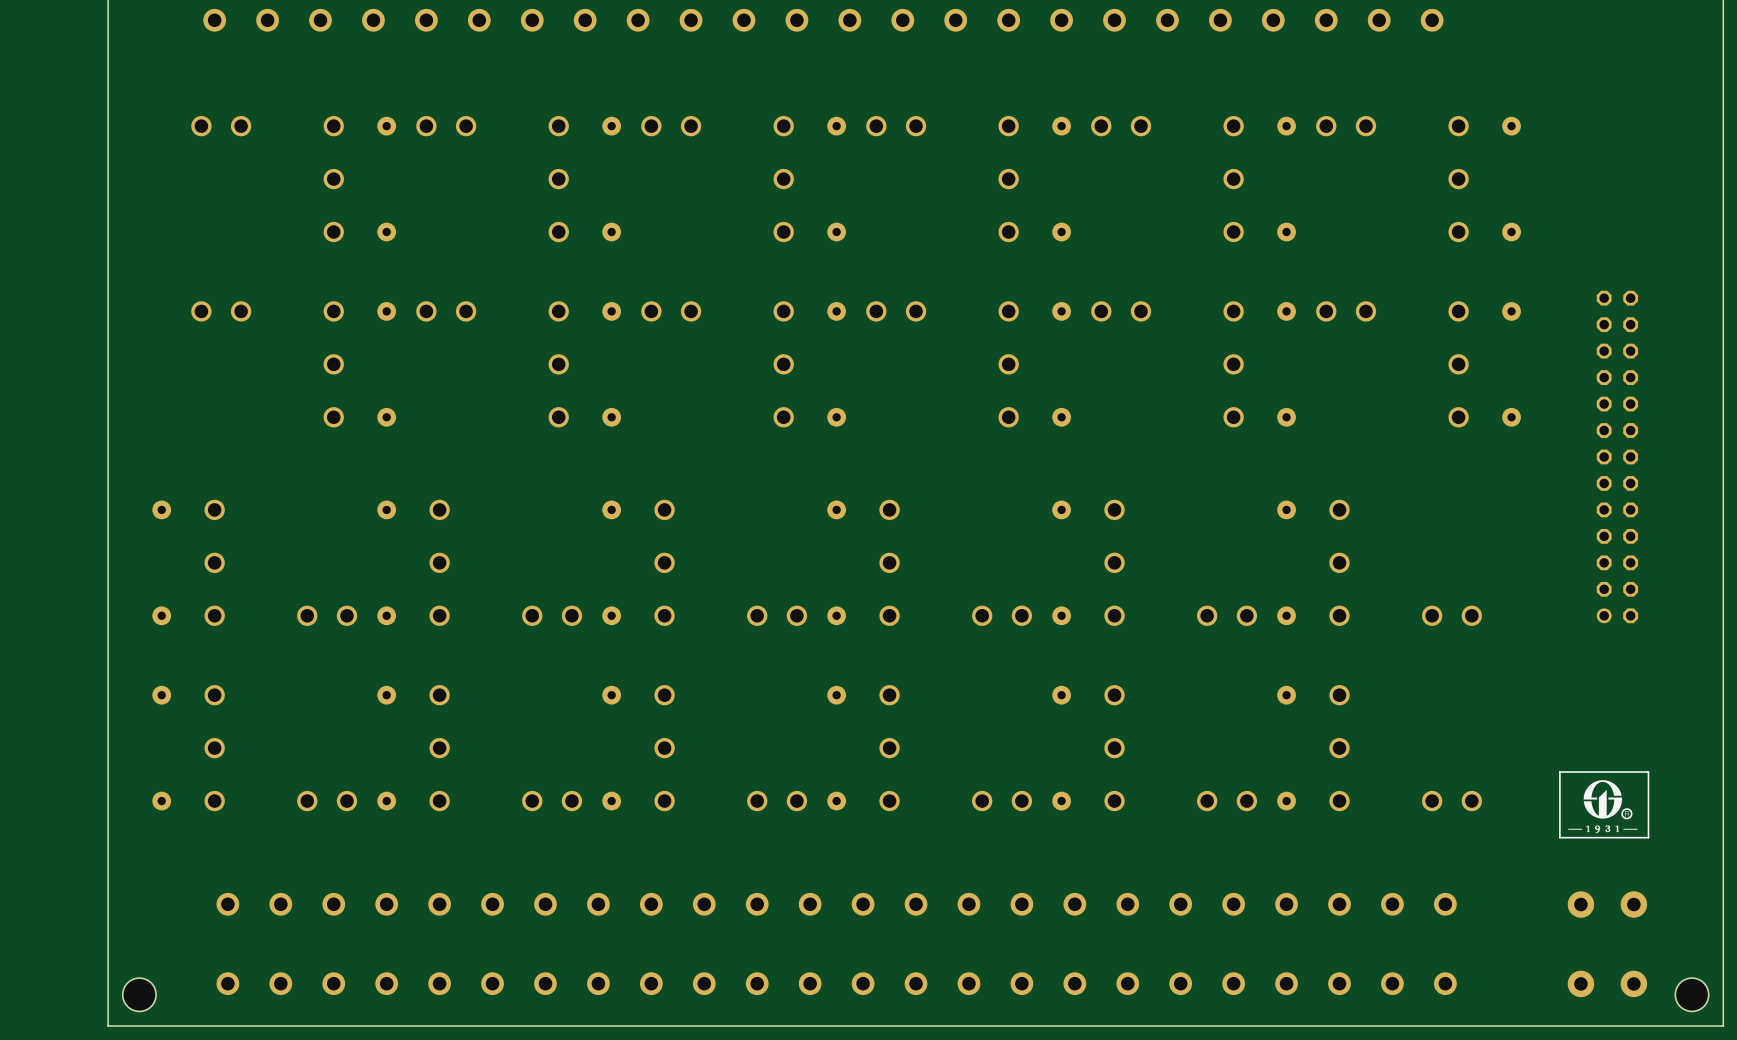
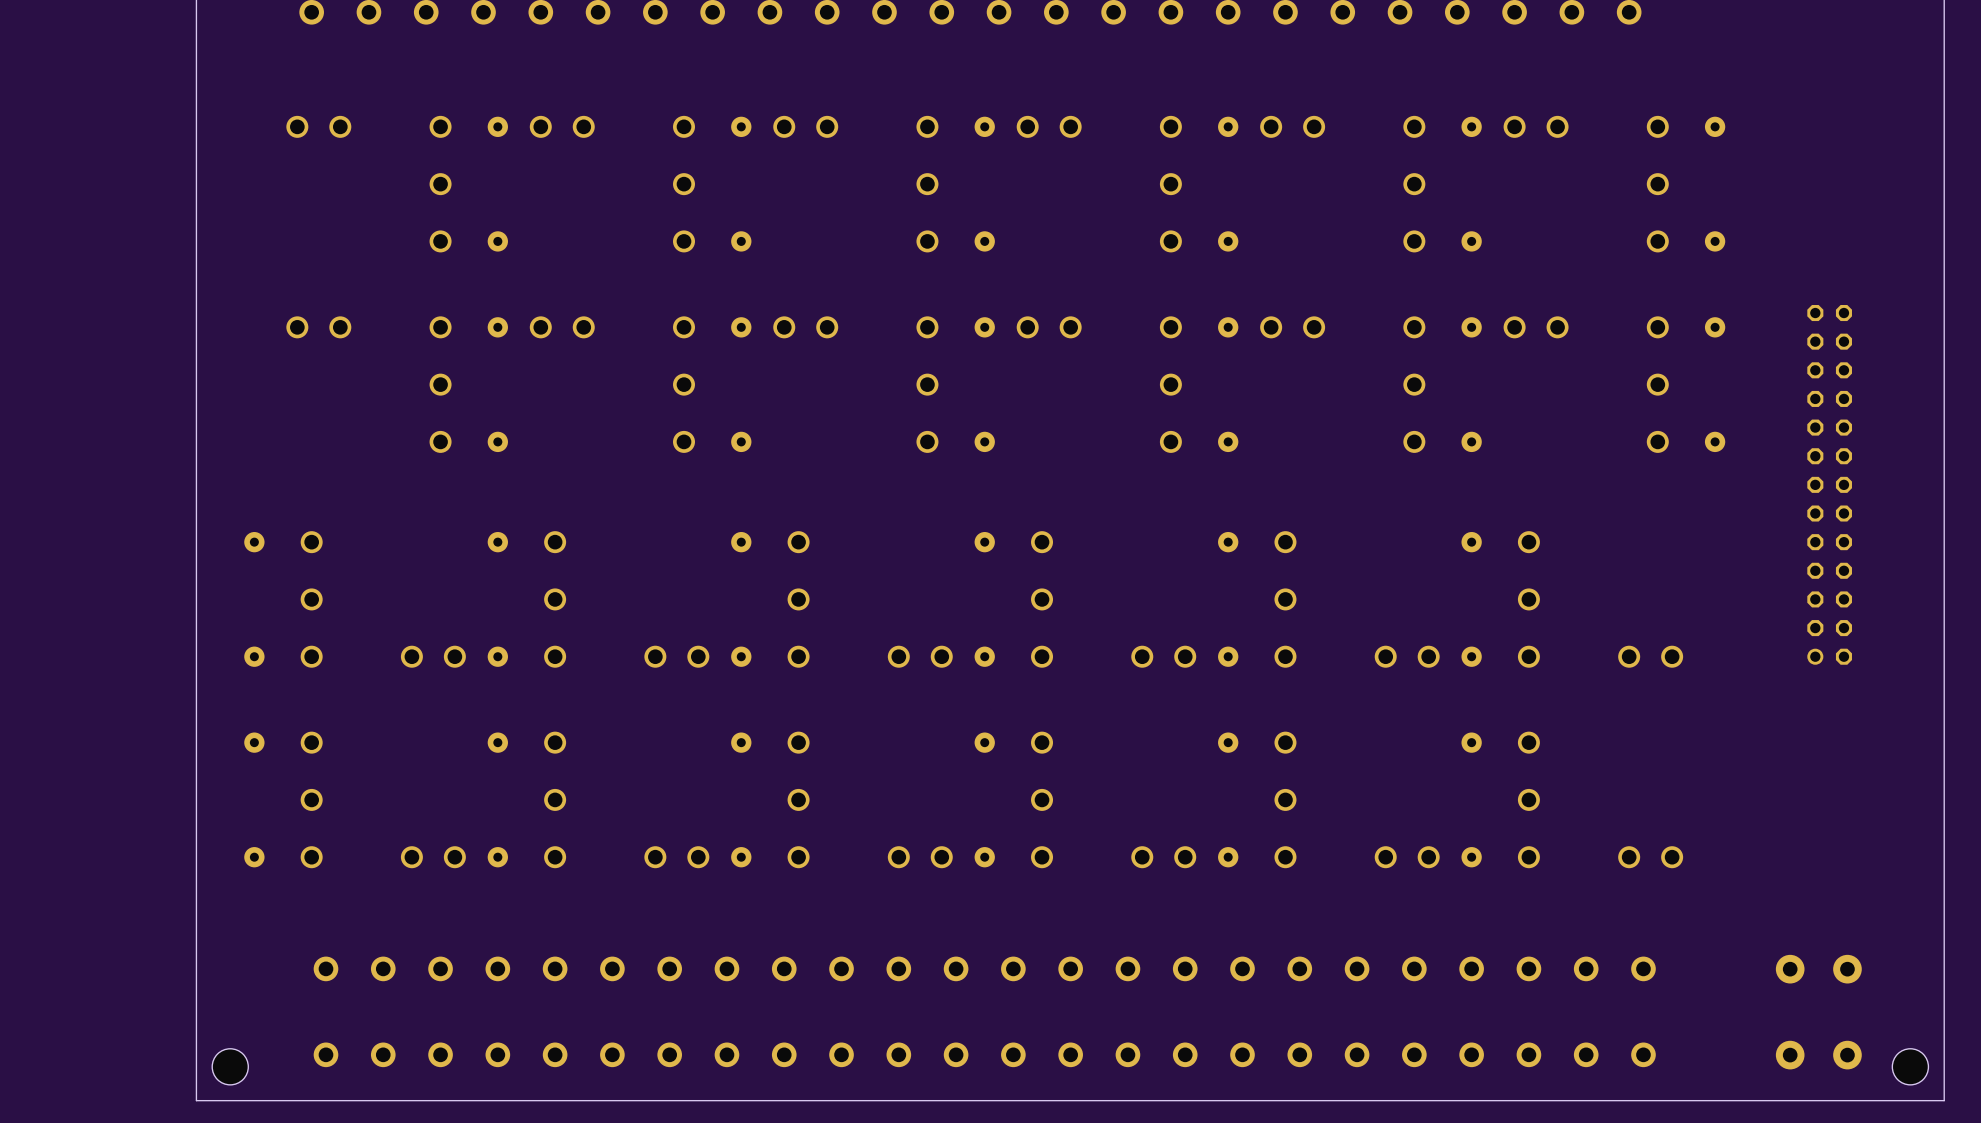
drawing: [1559, 771, 1650, 839] -> none

